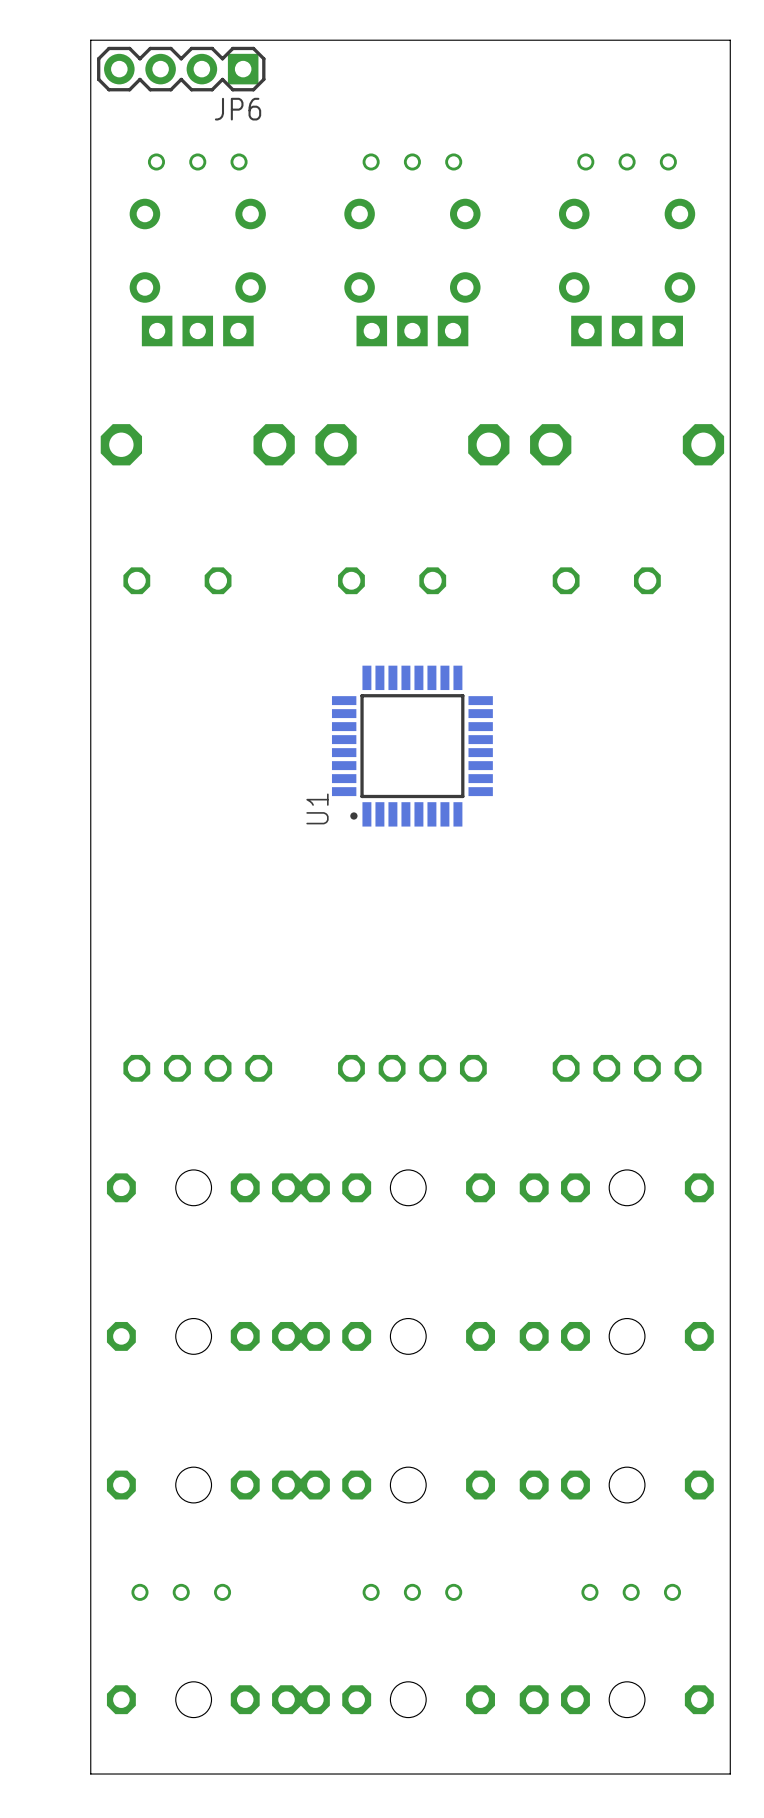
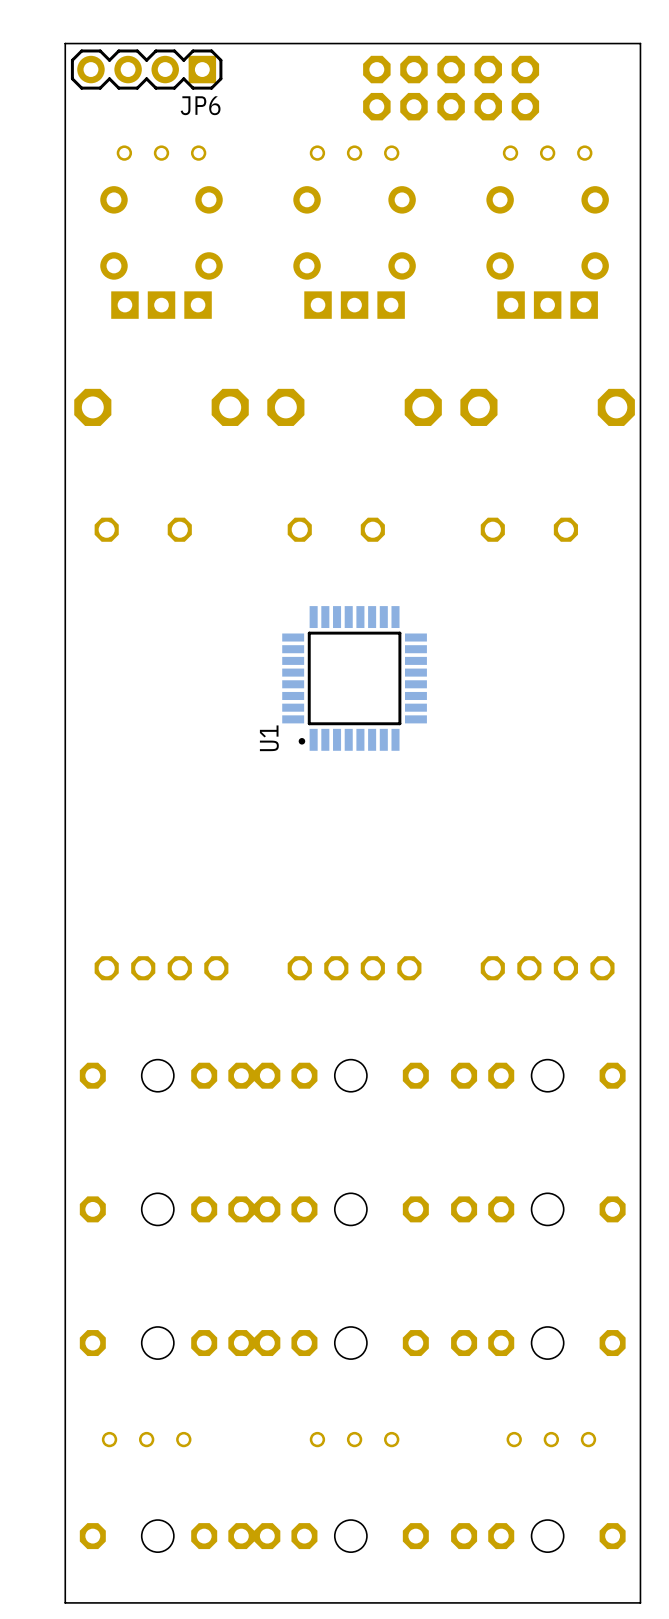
part: none -> (451, 88)

